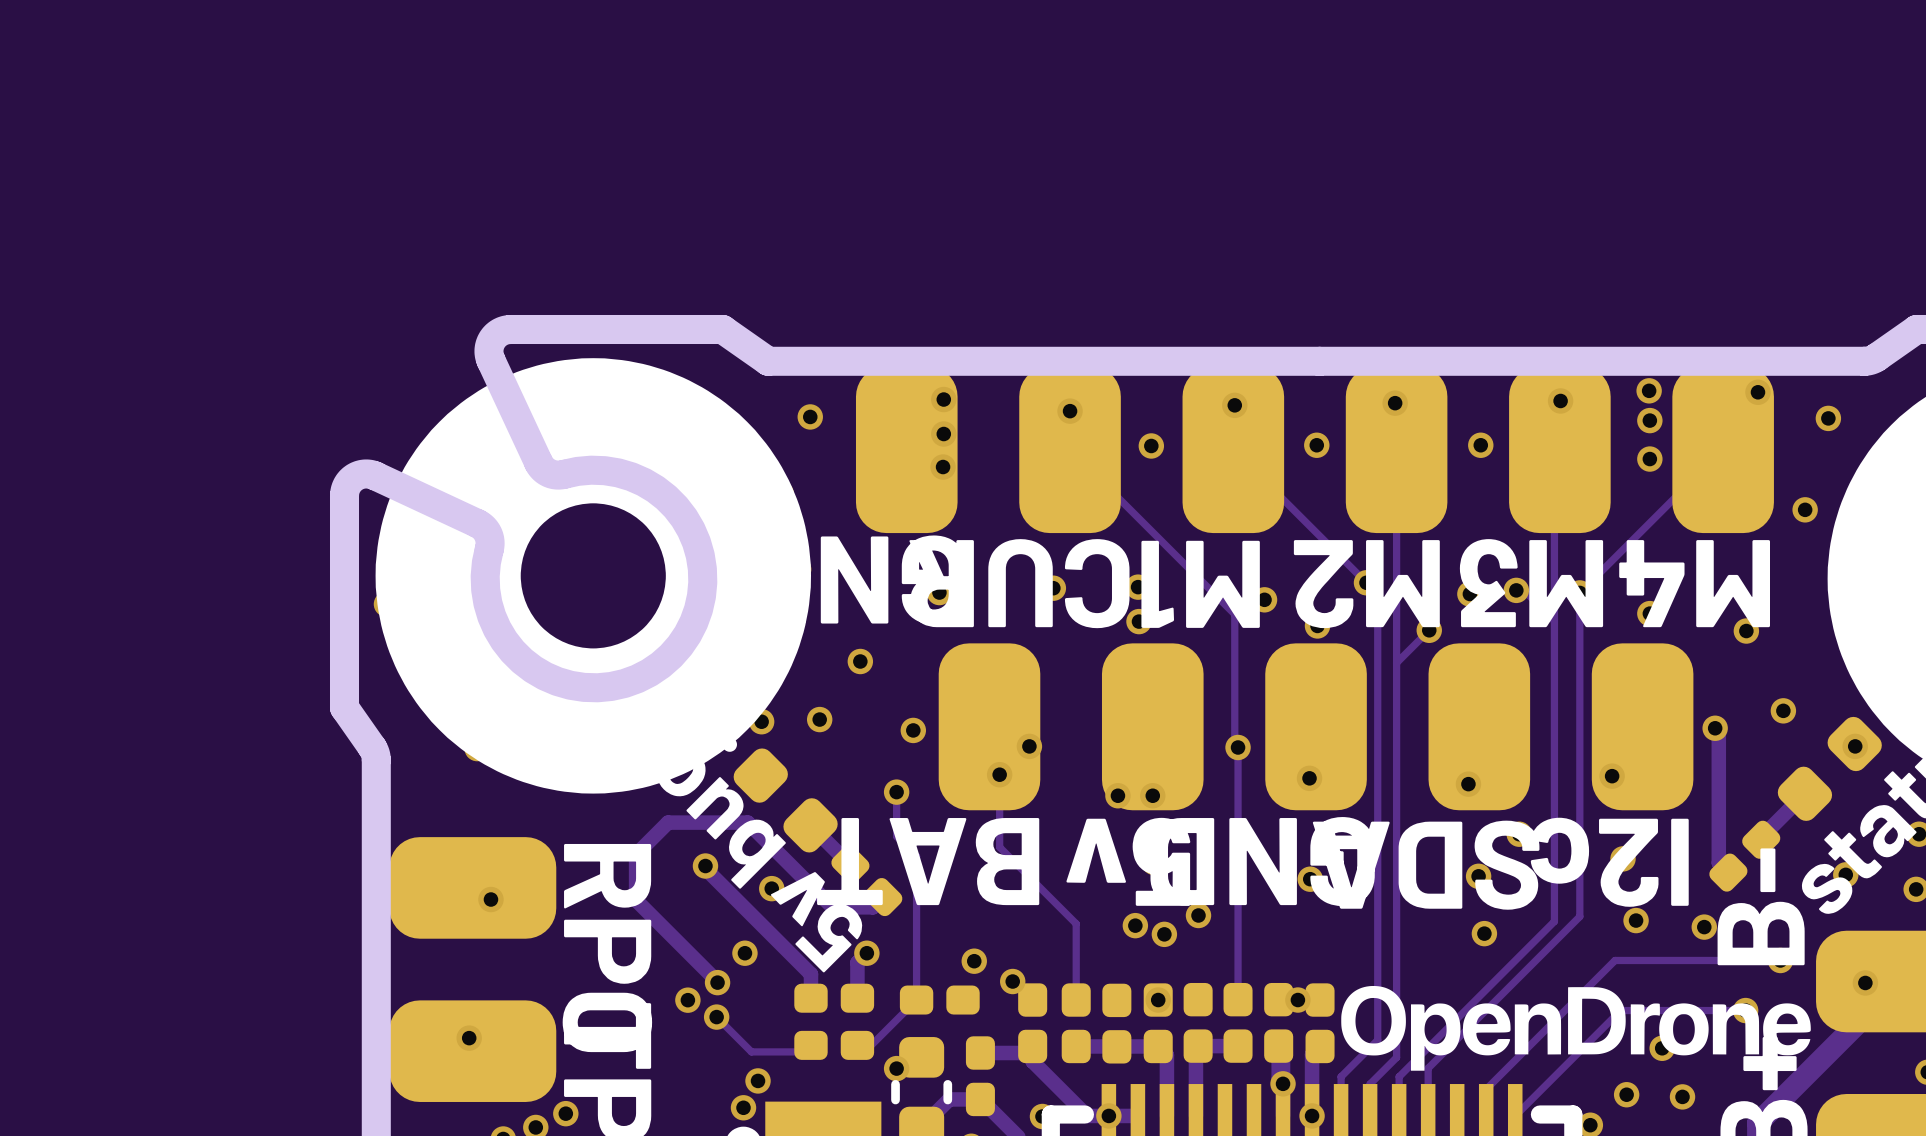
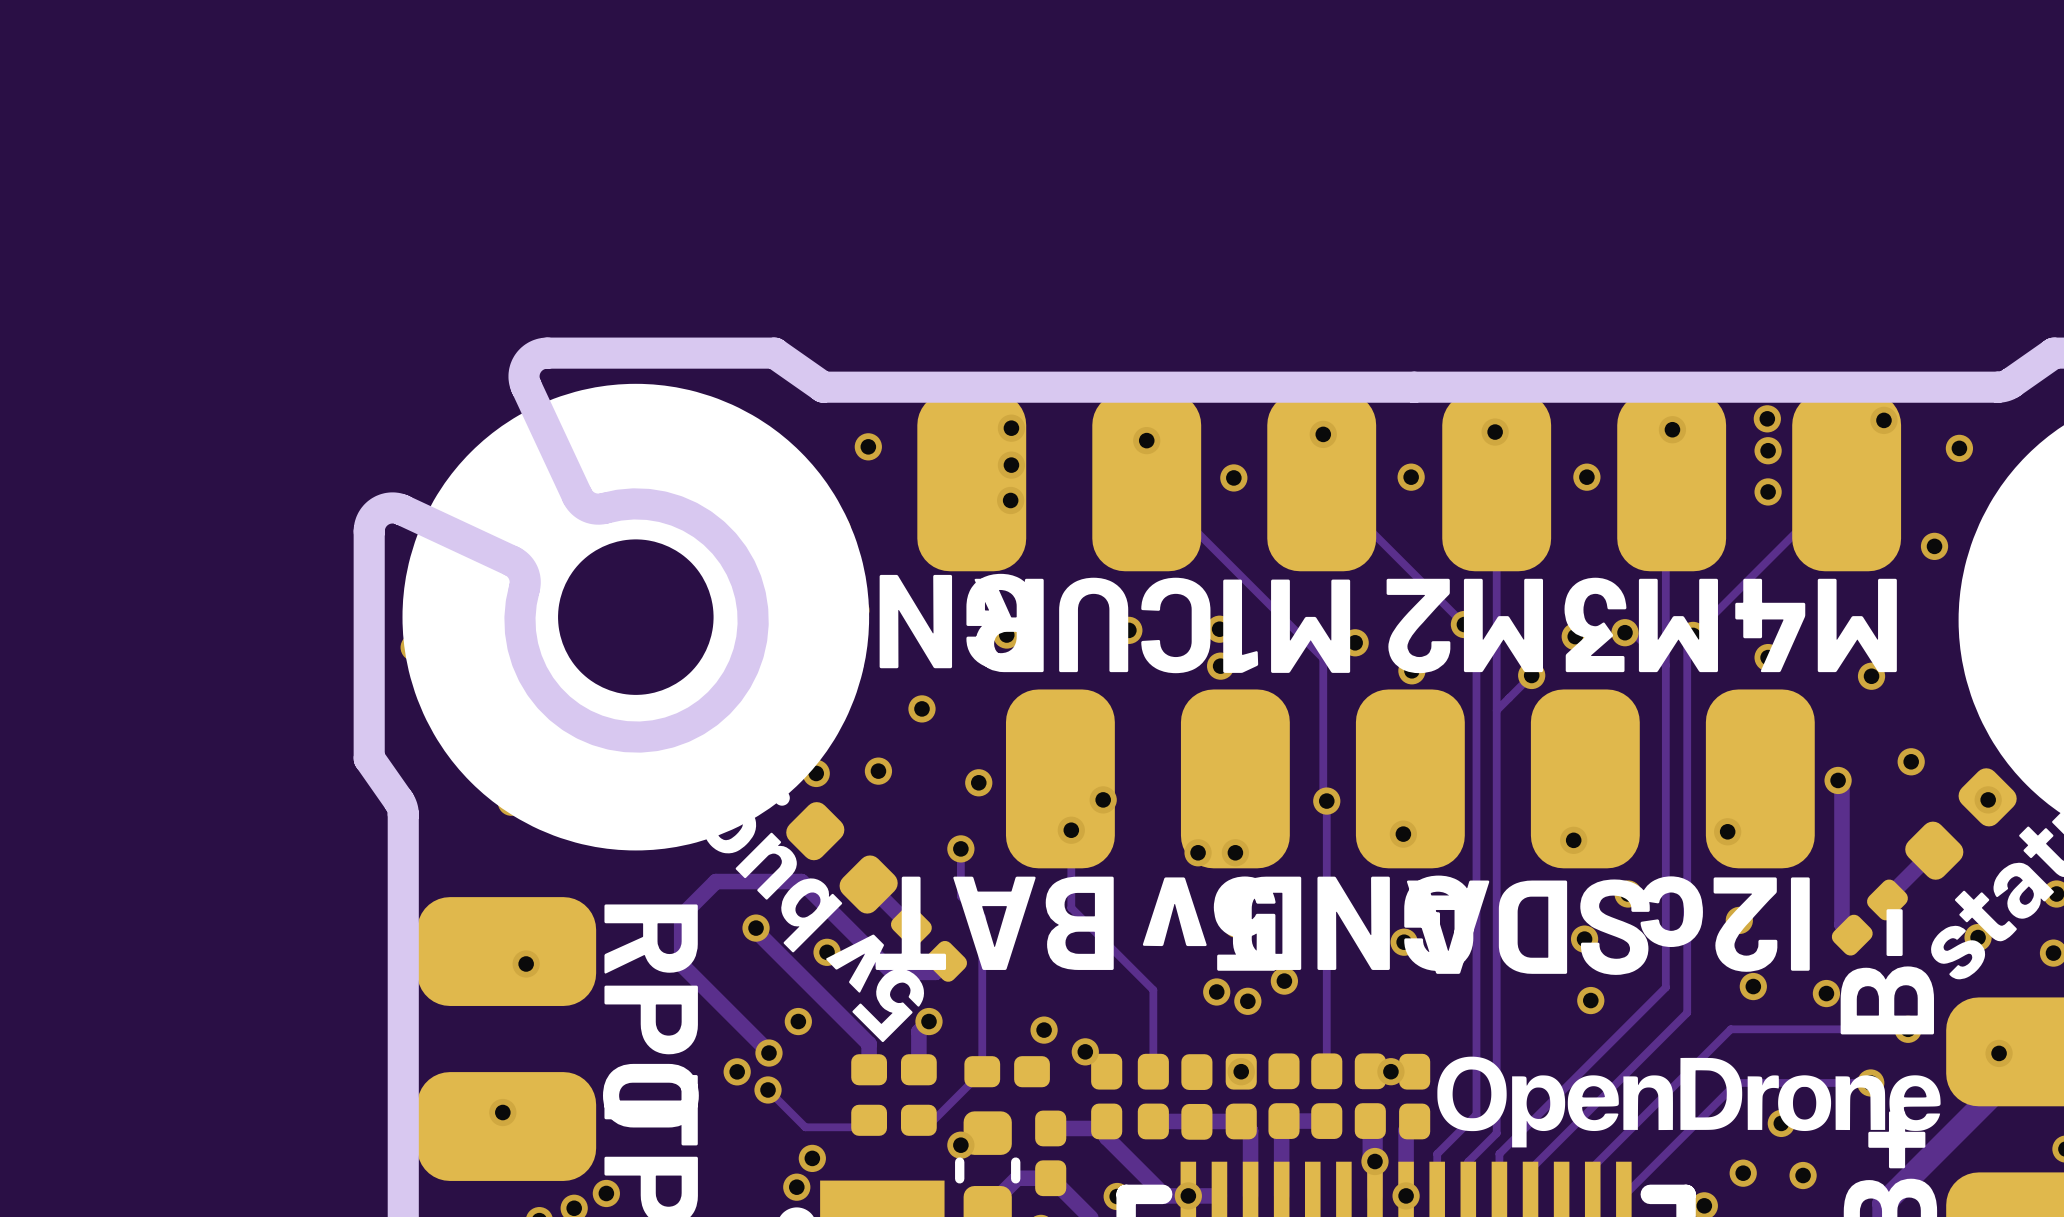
track: (1579, 592) (1579, 916) (1428, 1068) (1428, 1091) -> (1693, 635) (1687, 641) (1687, 1012) (1530, 1169)

